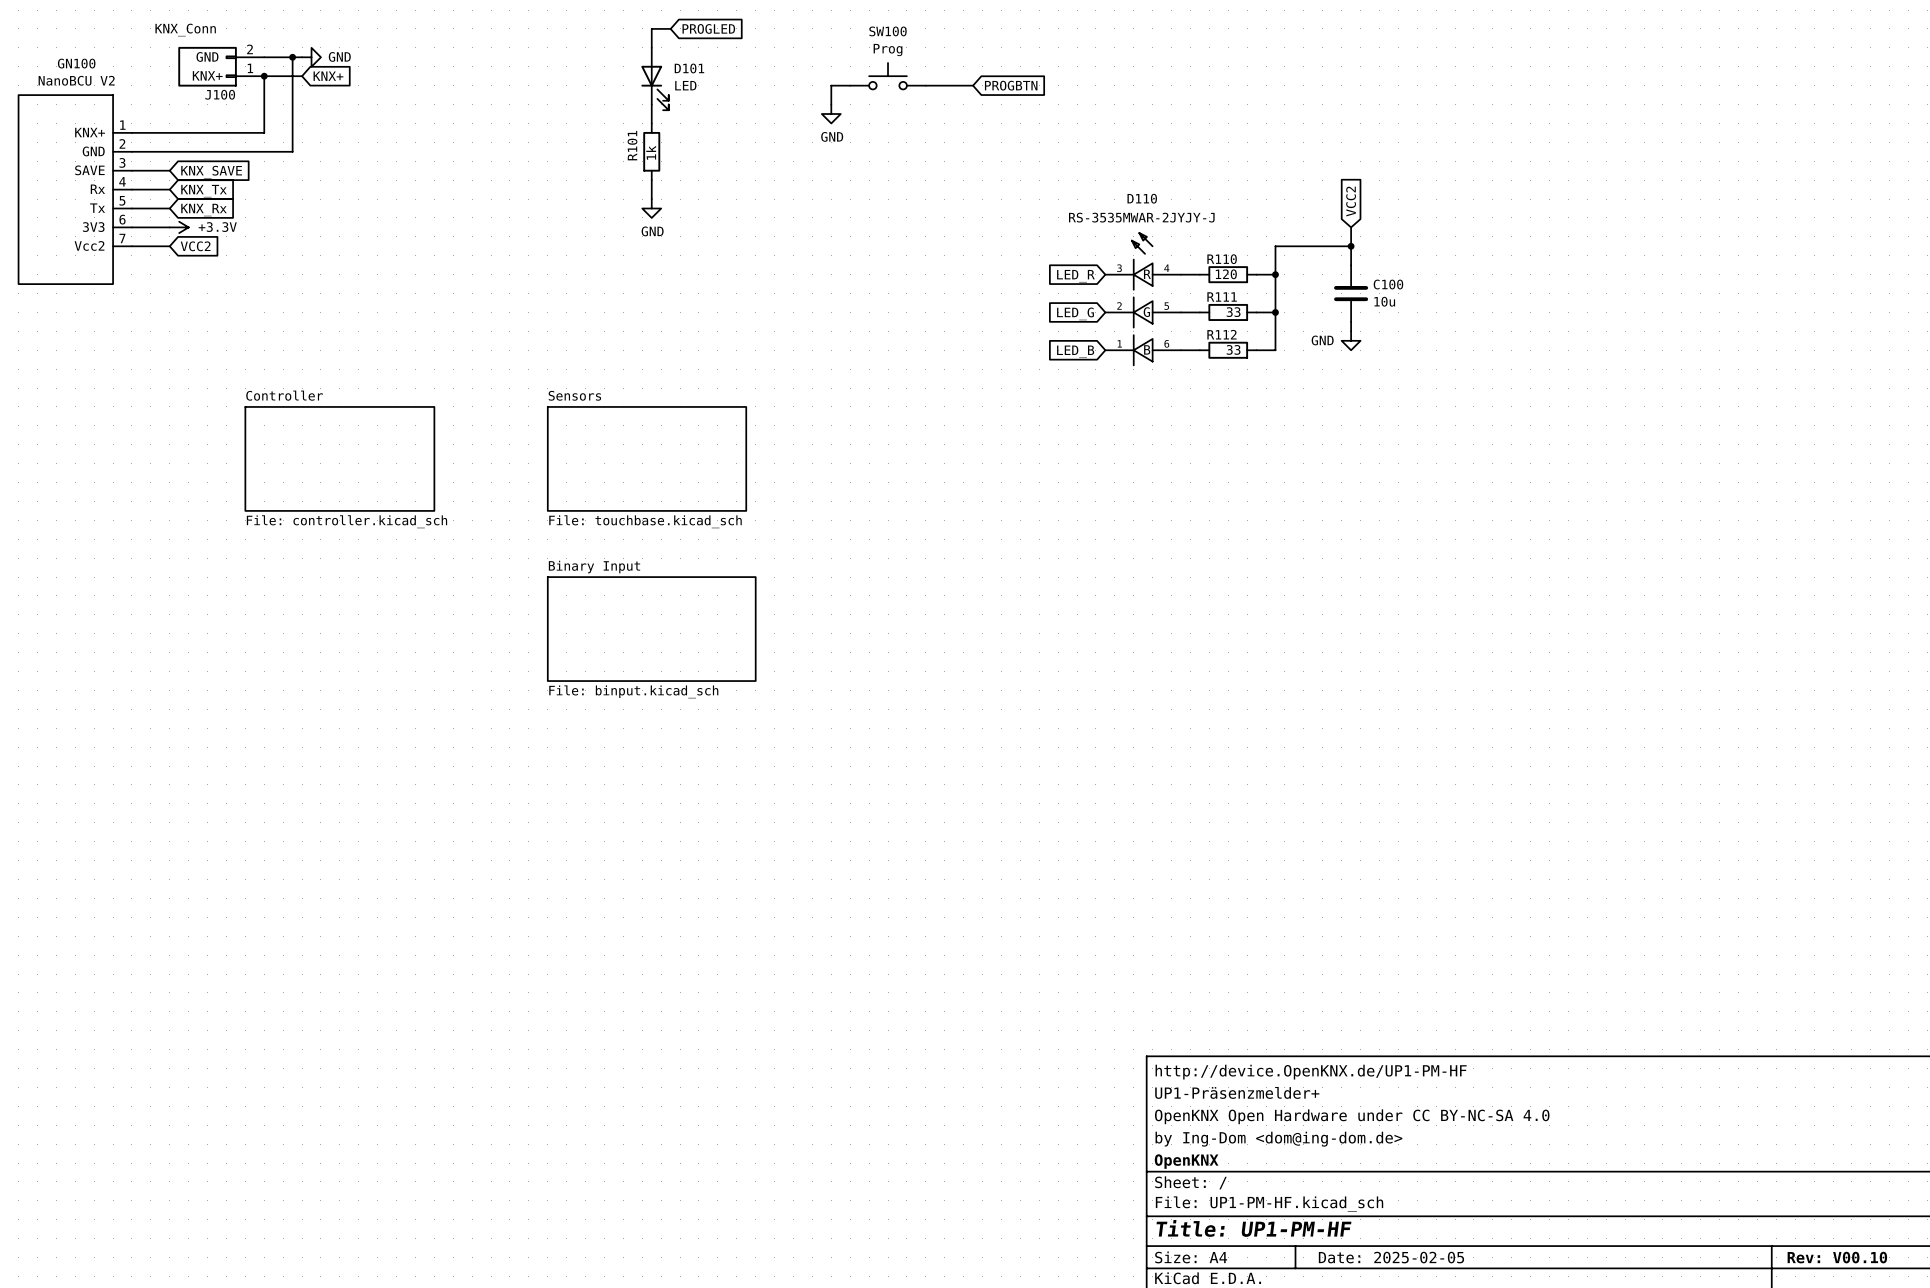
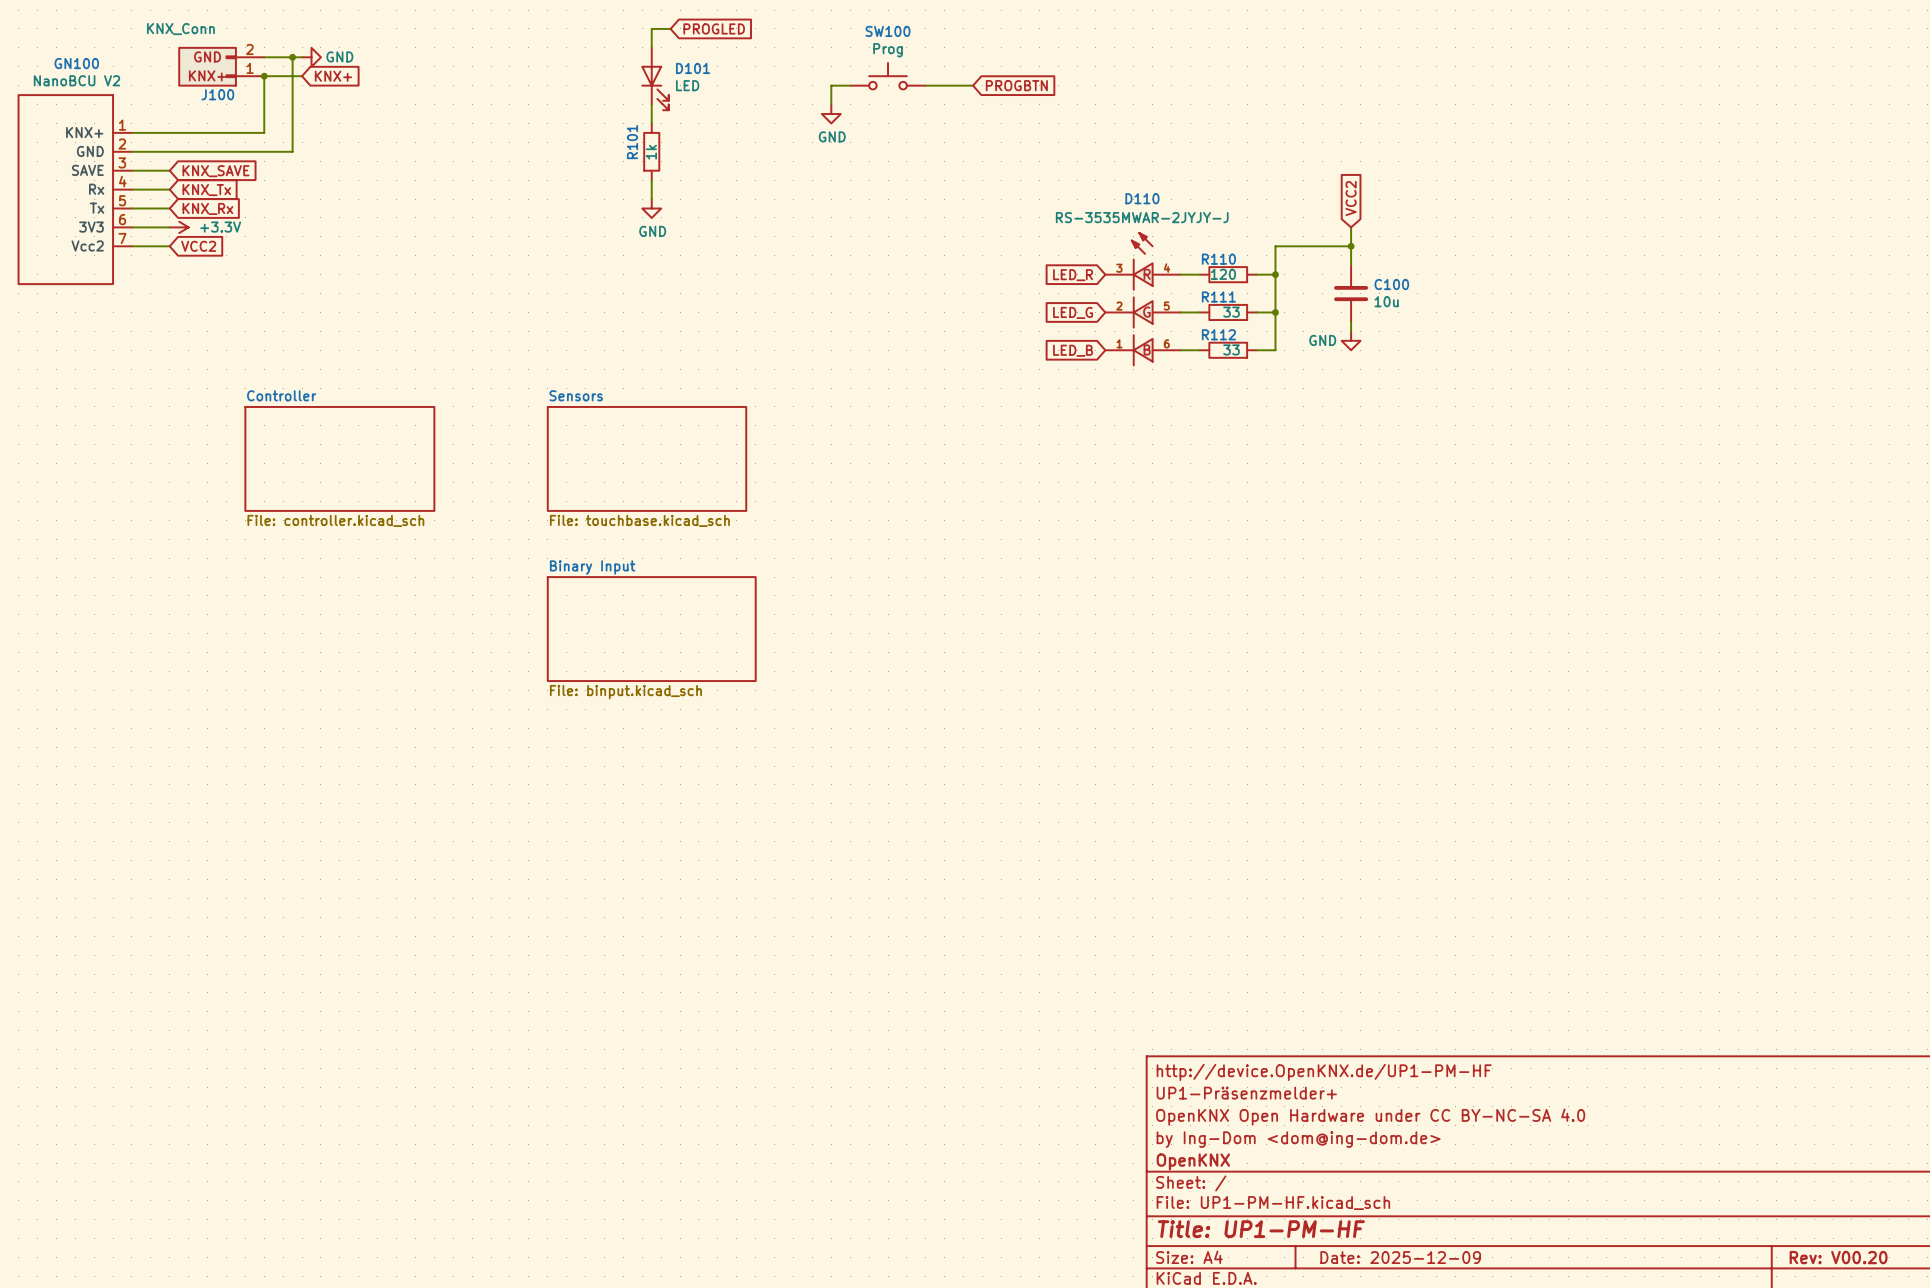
title block: Date: 2025-02-05 (1391, 1257) -> Date: 2025-12-09 (1400, 1257)
title block: Rev: V00.10 (1837, 1257) -> Rev: V00.20 (1838, 1257)

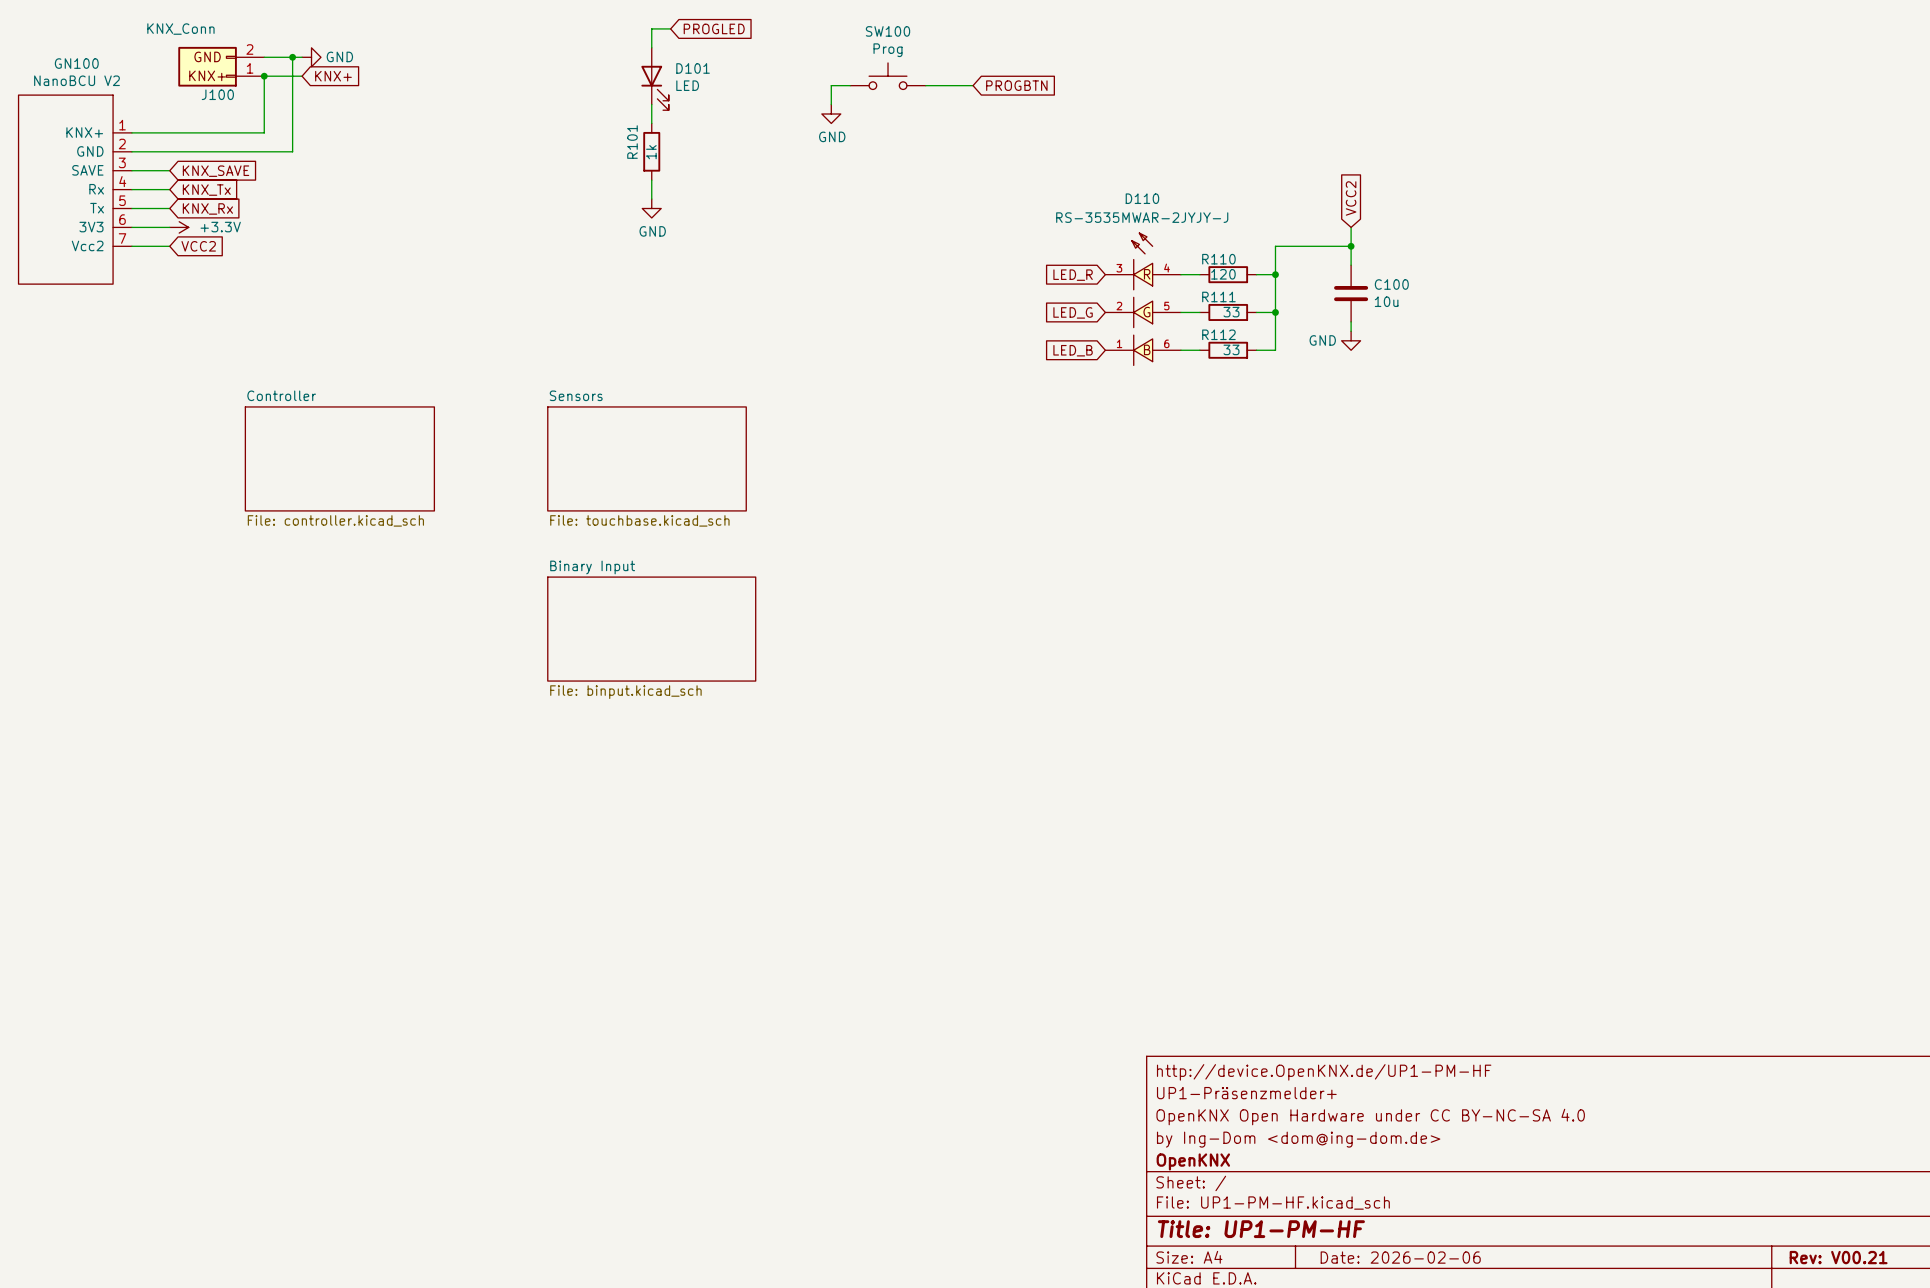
title block: Date: 2025-12-09 (1400, 1257) -> Date: 2026-02-06 (1400, 1257)
title block: Rev: V00.20 (1838, 1257) -> Rev: V00.21 (1838, 1257)

